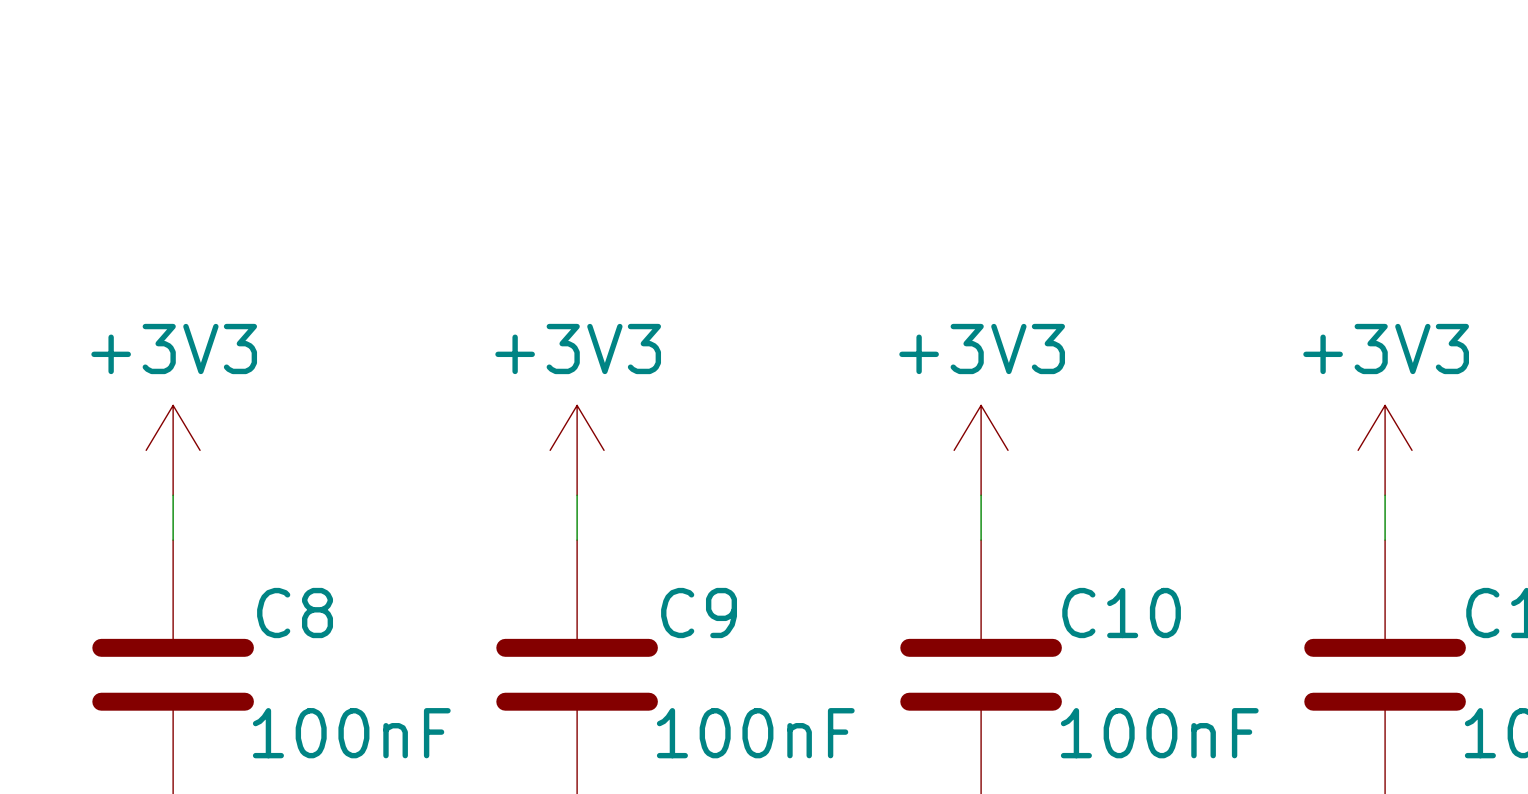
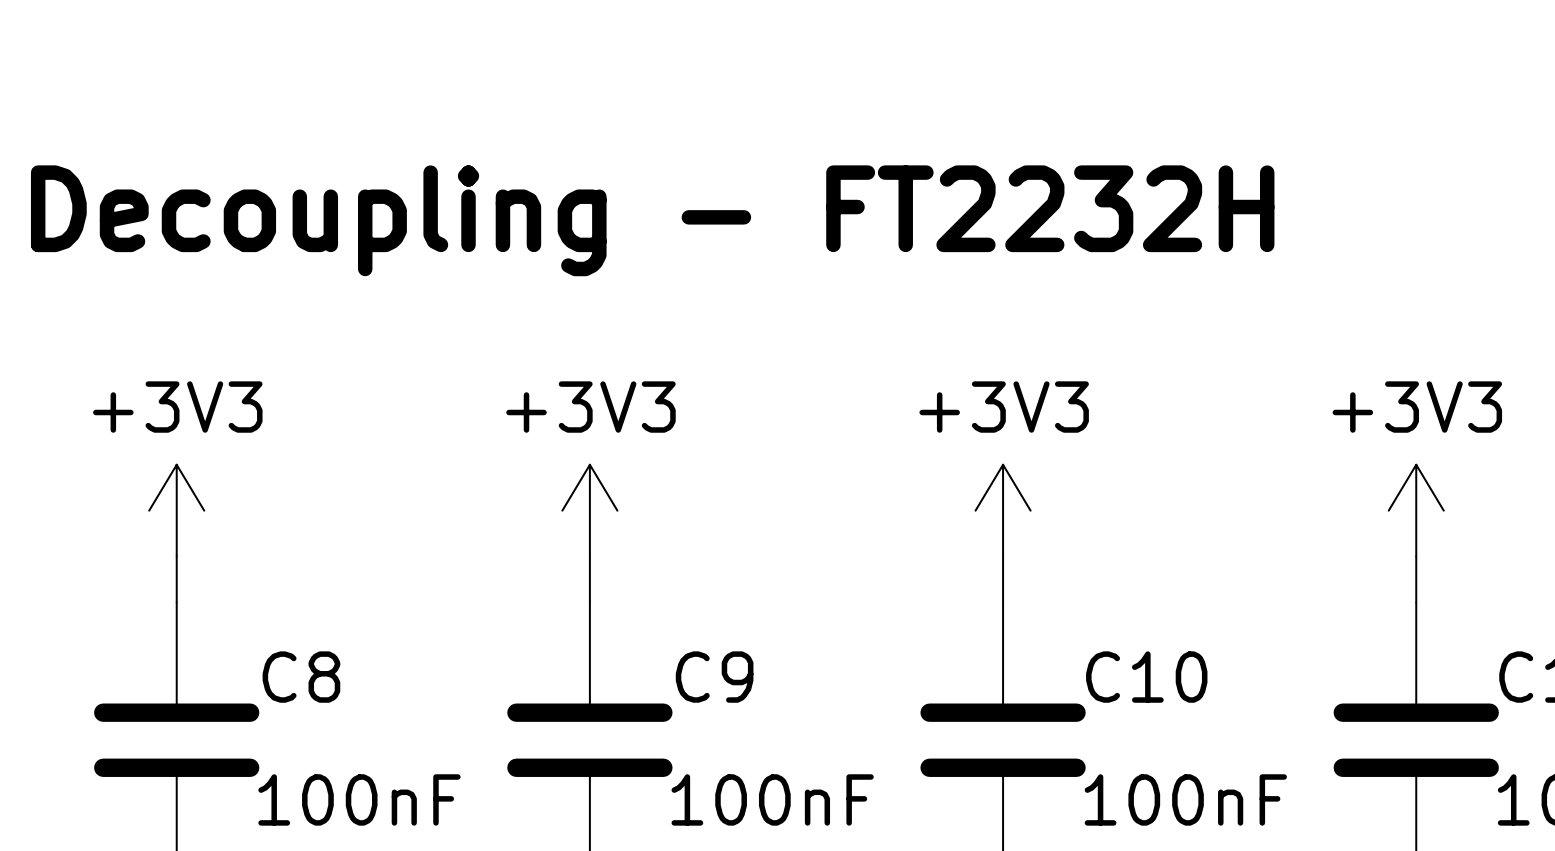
text: none -> Decoupling - FT2232H (652, 220)

